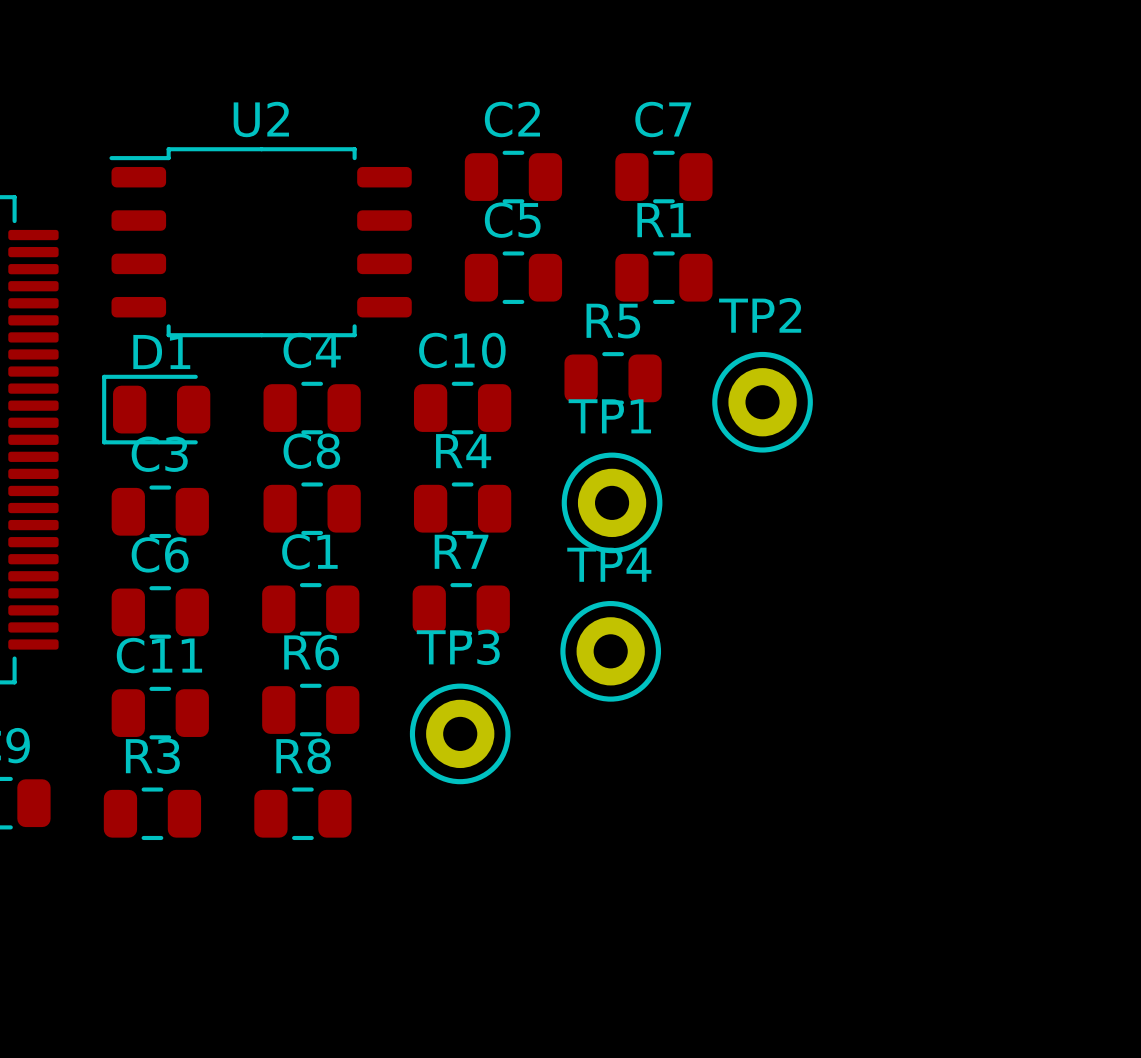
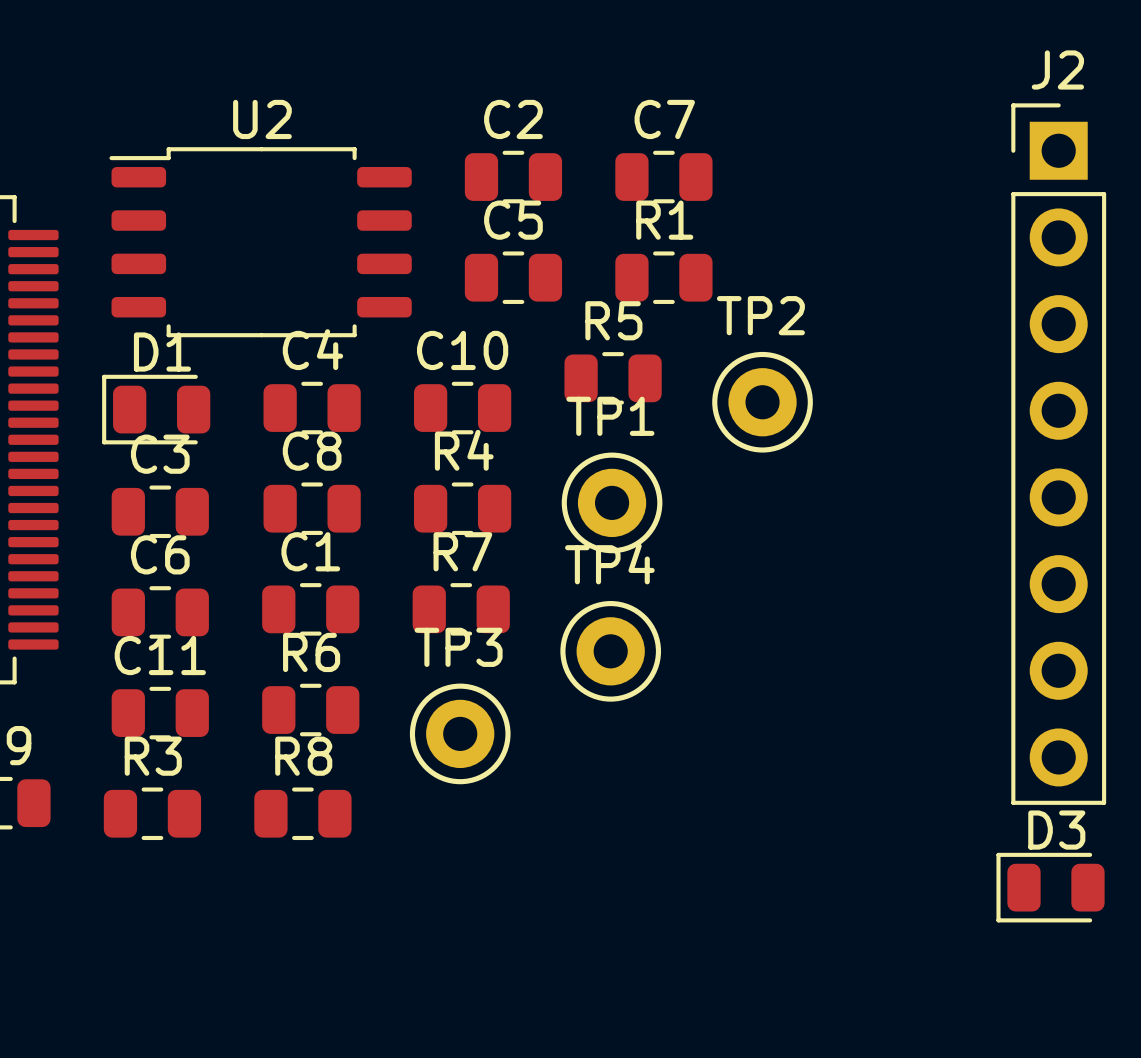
J2: none -> (1058, 454)
D3: none -> (1050, 887)

